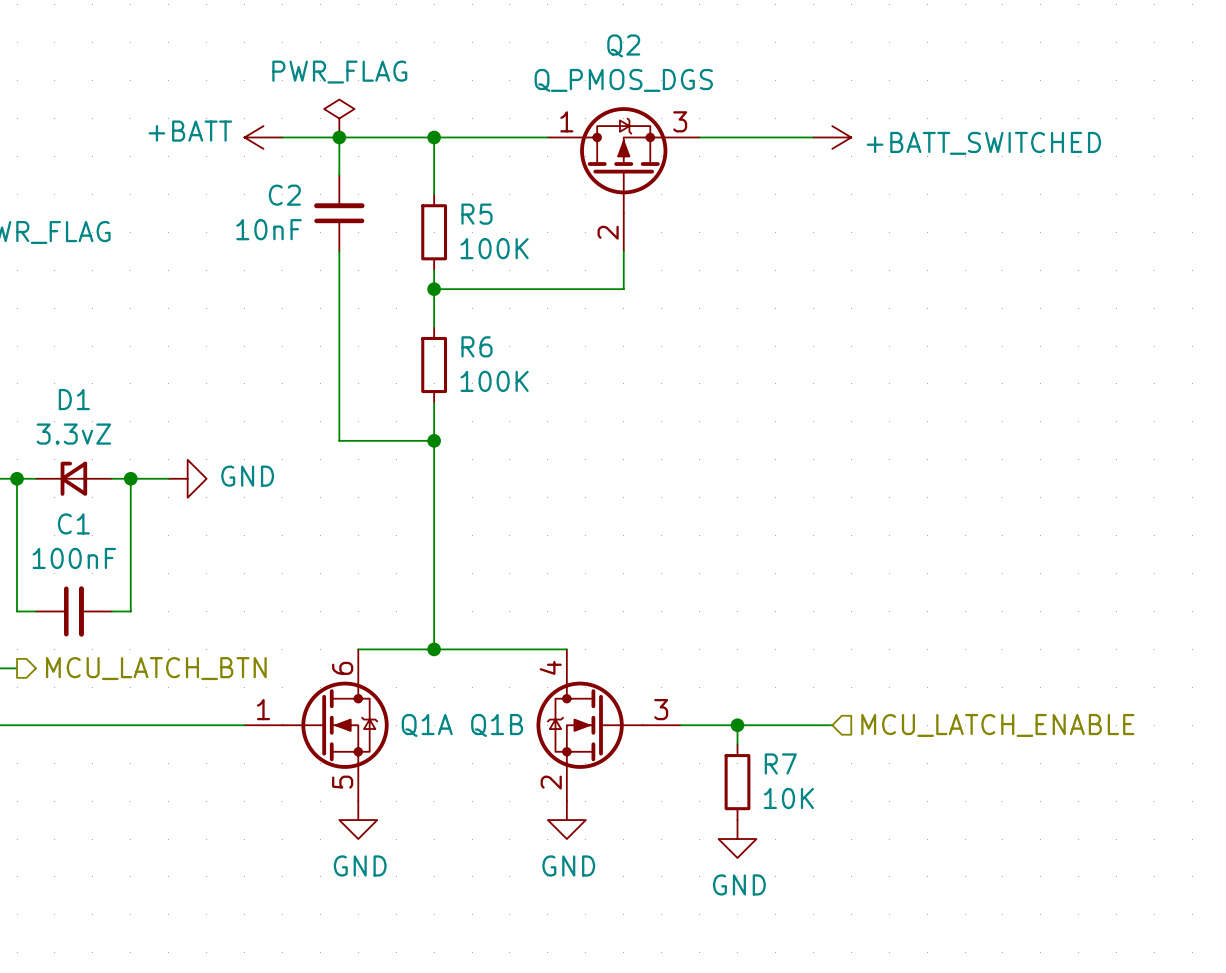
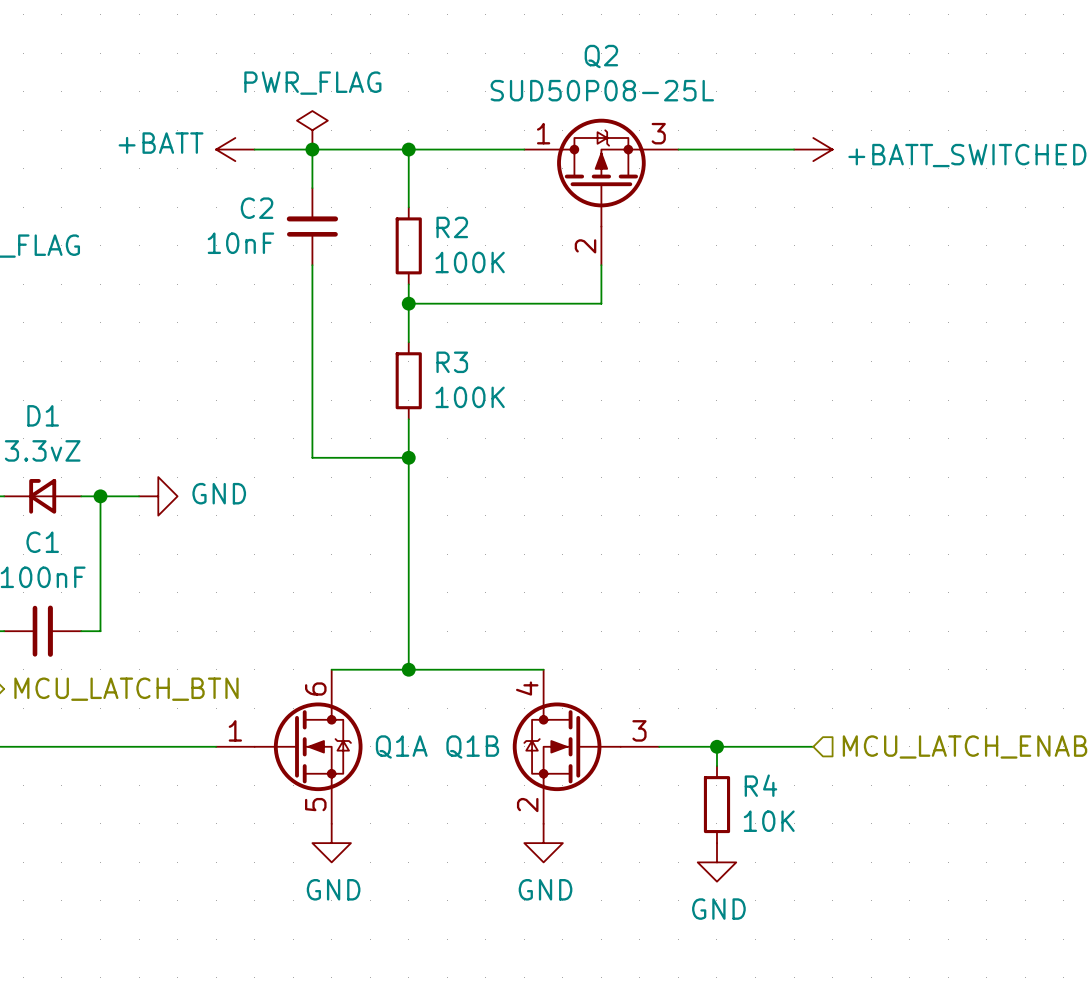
Q2 value: Q_PMOS_DGS (623, 80) -> SUD50P08-25L (602, 90)
R5 name: R5 (476, 214) -> R2 (452, 227)
R6 name: R6 (476, 346) -> R3 (452, 362)
R7 name: R7 (780, 763) -> R4 (760, 785)

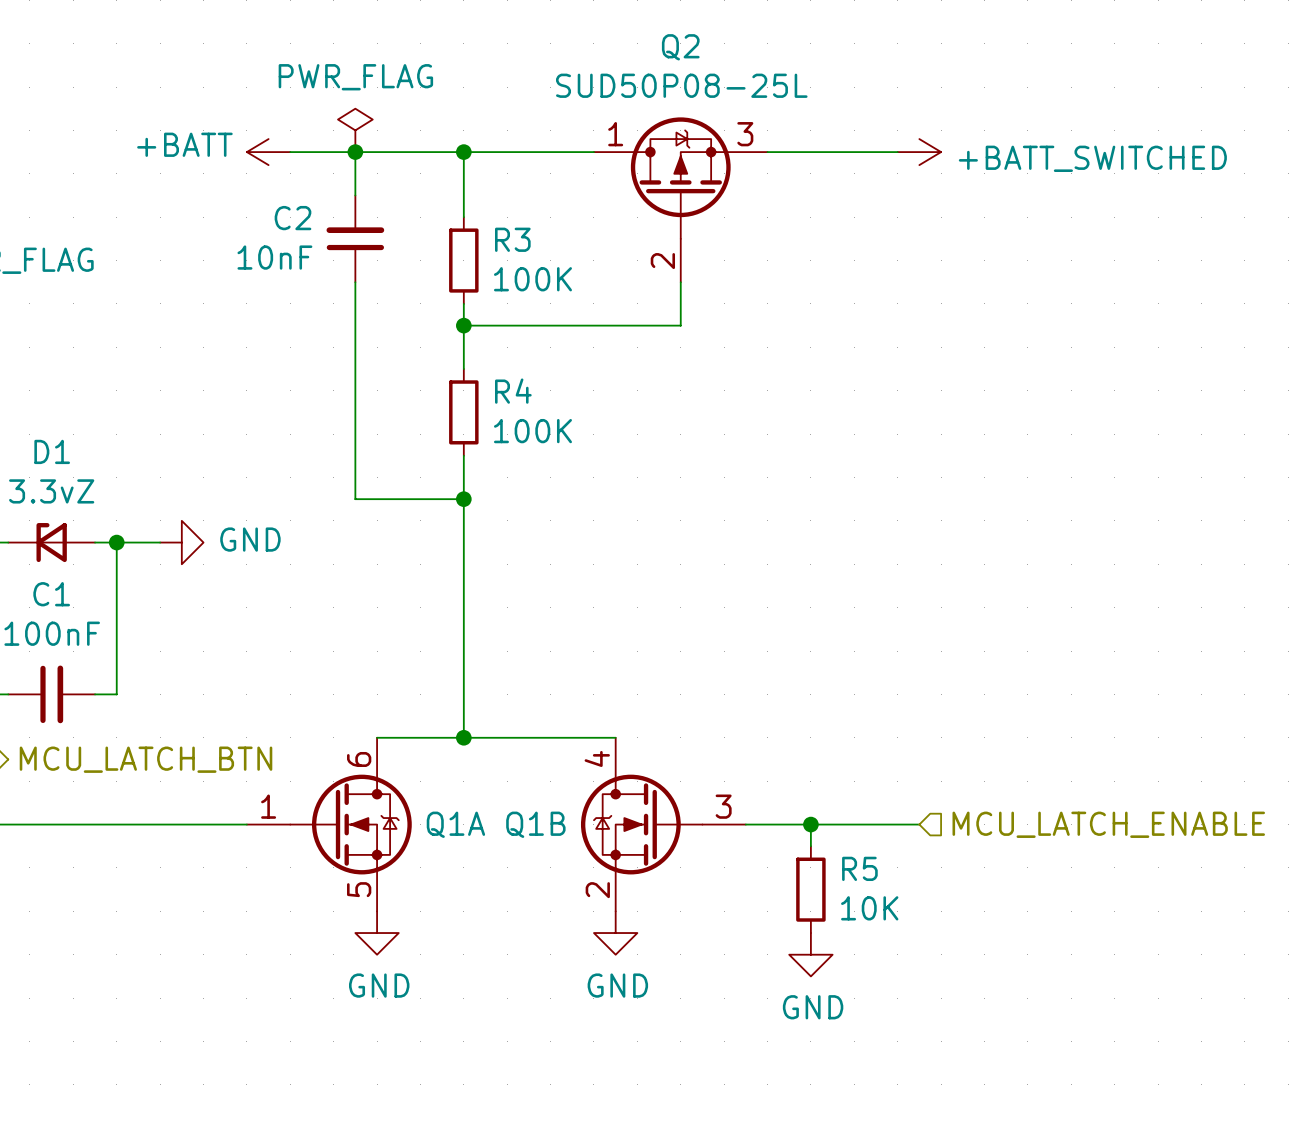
R2 name: R2 (452, 227) -> R3 (512, 239)
R3 name: R3 (452, 362) -> R4 (513, 391)
R4 name: R4 (760, 785) -> R5 (859, 868)

